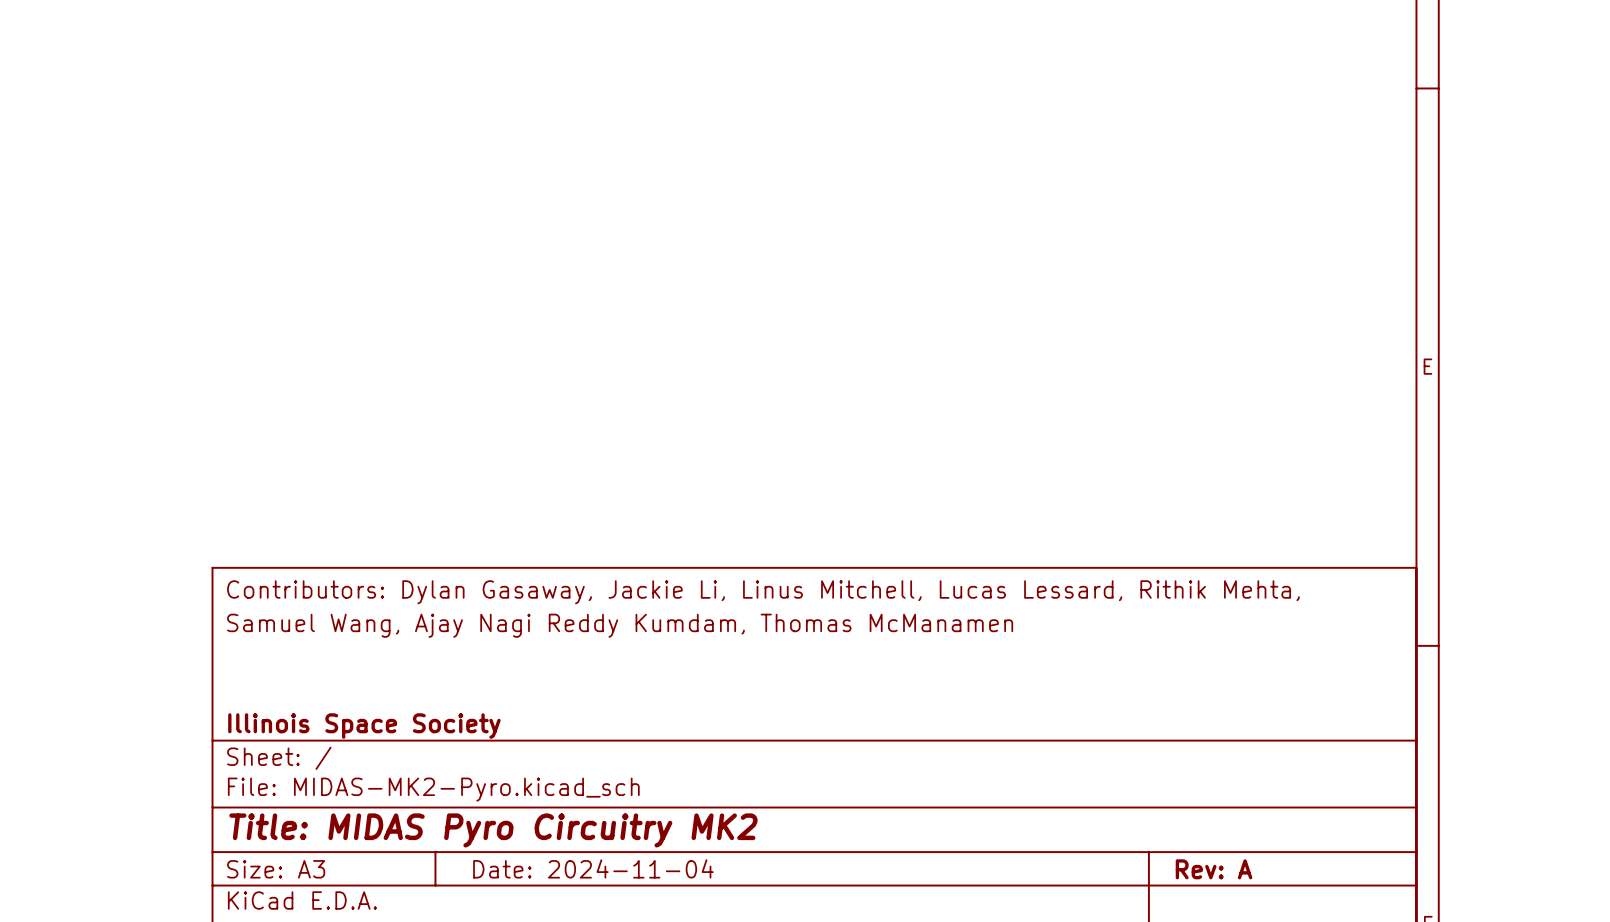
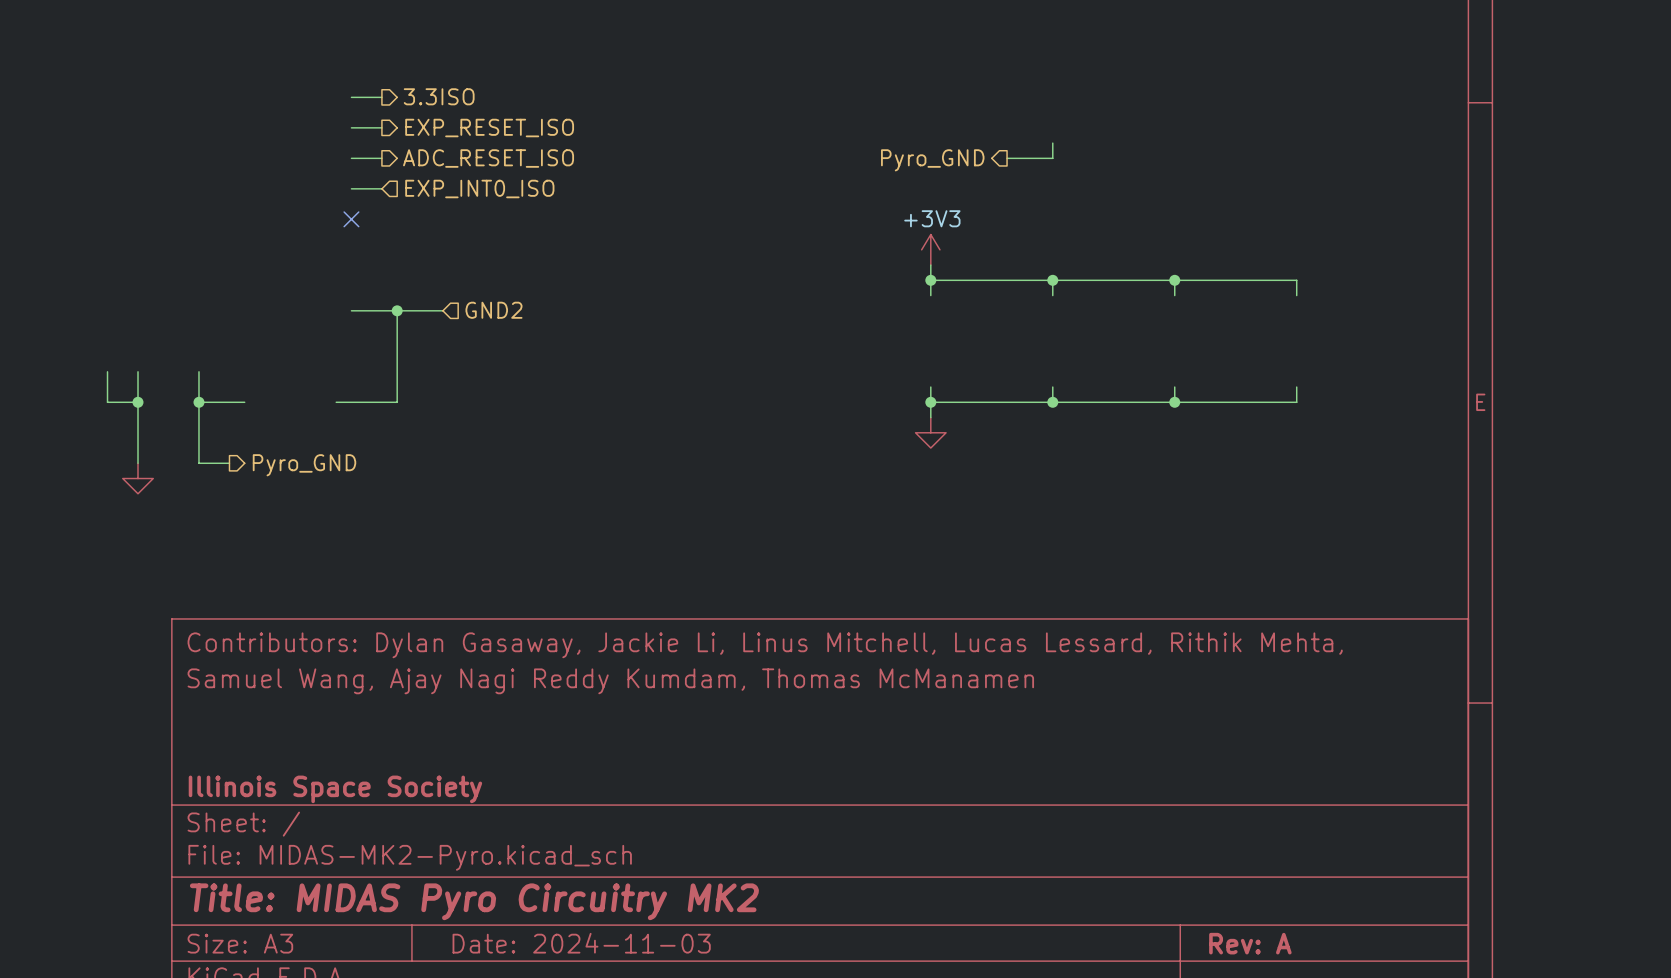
hierarchical label: none -> 3.3ISO (439, 96)
wire: none -> (351, 97) (381, 97)
wire: none -> (351, 127) (381, 127)
hierarchical label: none -> EXP_RESET_ISO (489, 128)
wire: none -> (1052, 143) (1052, 158) (1007, 158)
wire: none -> (351, 158) (381, 158)
hierarchical label: none -> ADC_RESET_ISO (488, 158)
hierarchical label: none -> Pyro_GND (932, 160)
wire: none -> (351, 188) (381, 188)
hierarchical label: none -> EXP_INT0_ISO (479, 189)
no-connect mark: none -> (351, 219)
power symbol: none -> +3V3 (930, 249)
wire: none -> (930, 265) (930, 295)
wire: none -> (930, 280) (1296, 280) (1296, 295)
junction: none -> (930, 280)
wire: none -> (1052, 280) (1052, 295)
junction: none -> (1052, 280)
wire: none -> (1174, 280) (1174, 295)
junction: none -> (1174, 280)
wire: none -> (351, 310) (442, 310)
wire: none -> (397, 310) (397, 402) (336, 402)
junction: none -> (397, 310)
hierarchical label: none -> GND2 (493, 310)
wire: none -> (107, 371) (107, 402) (138, 402)
wire: none -> (138, 371) (138, 463)
wire: none -> (198, 371) (198, 463) (229, 463)
wire: none -> (930, 387) (930, 417)
wire: none -> (1052, 387) (1052, 402)
wire: none -> (1174, 387) (1174, 402)
wire: none -> (1296, 387) (1296, 402) (930, 402)
junction: none -> (138, 402)
wire: none -> (198, 402) (244, 402)
junction: none -> (198, 402)
junction: none -> (930, 402)
junction: none -> (1052, 402)
junction: none -> (1174, 402)
power symbol: none -> (930, 432)
hierarchical label: none -> Pyro_GND (304, 465)
power symbol: none -> (138, 478)
title block: Date: 2024-11-04 (593, 868) -> Date: 2024-11-03 (581, 943)

